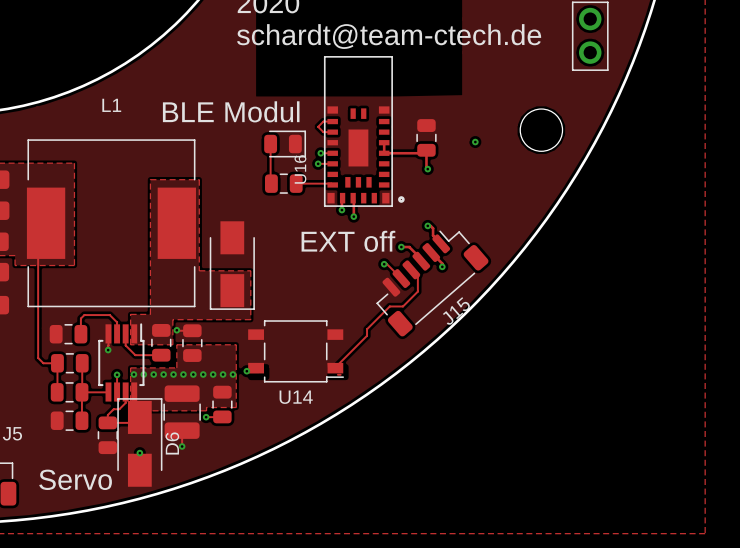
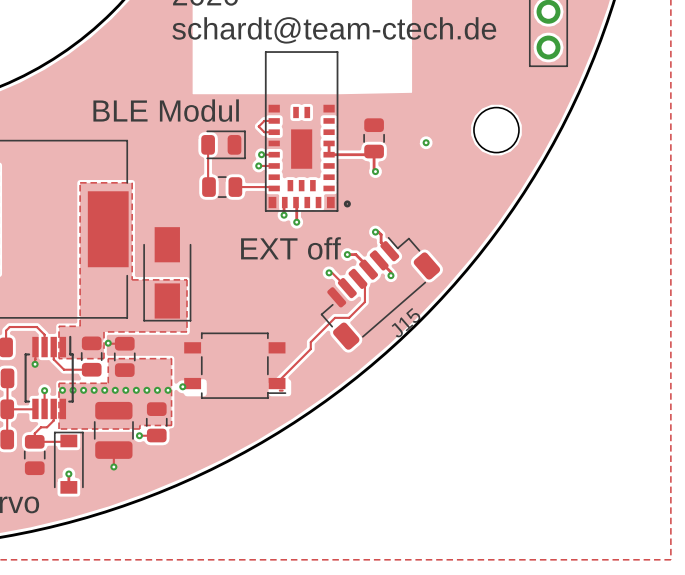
L1 name: L1 (111, 105) -> none
U16 name: U16 (300, 169) -> none
U14 name: U14 (296, 397) -> none
D6: (139, 442) -> none
part: none -> (68, 462)

